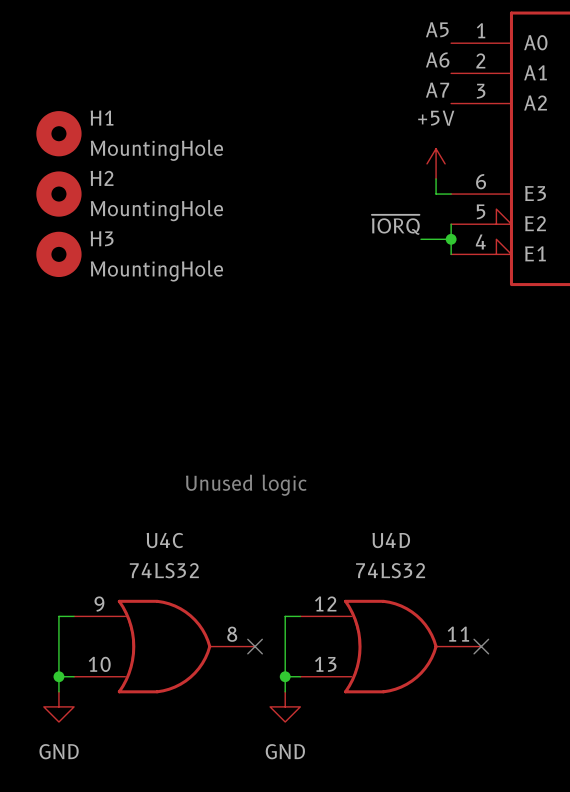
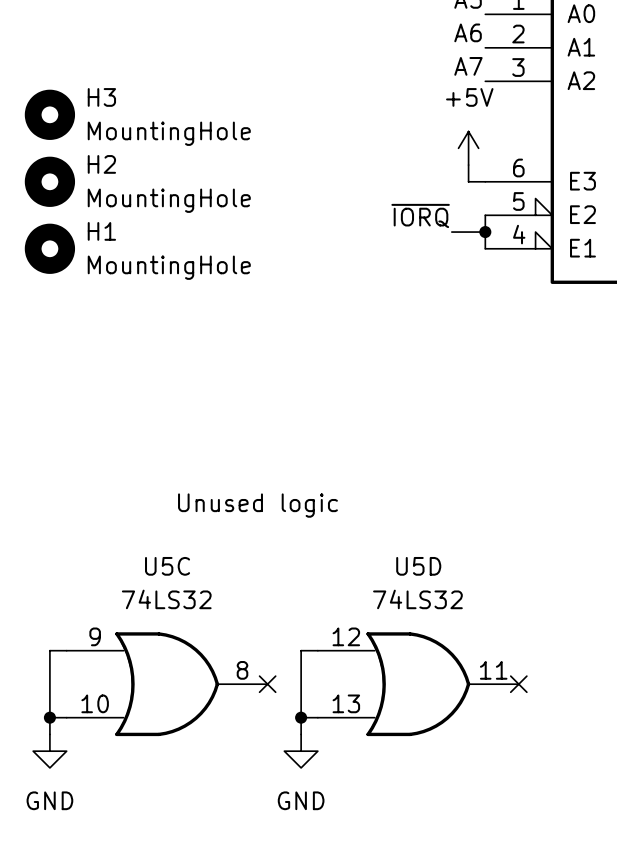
H1 name: H1 (102, 118) -> H3 (101, 97)
H3 name: H3 (102, 238) -> H1 (101, 231)
U4C name: U4C (164, 540) -> U5C (167, 566)
U4D name: U4D (391, 540) -> U5D (418, 566)

